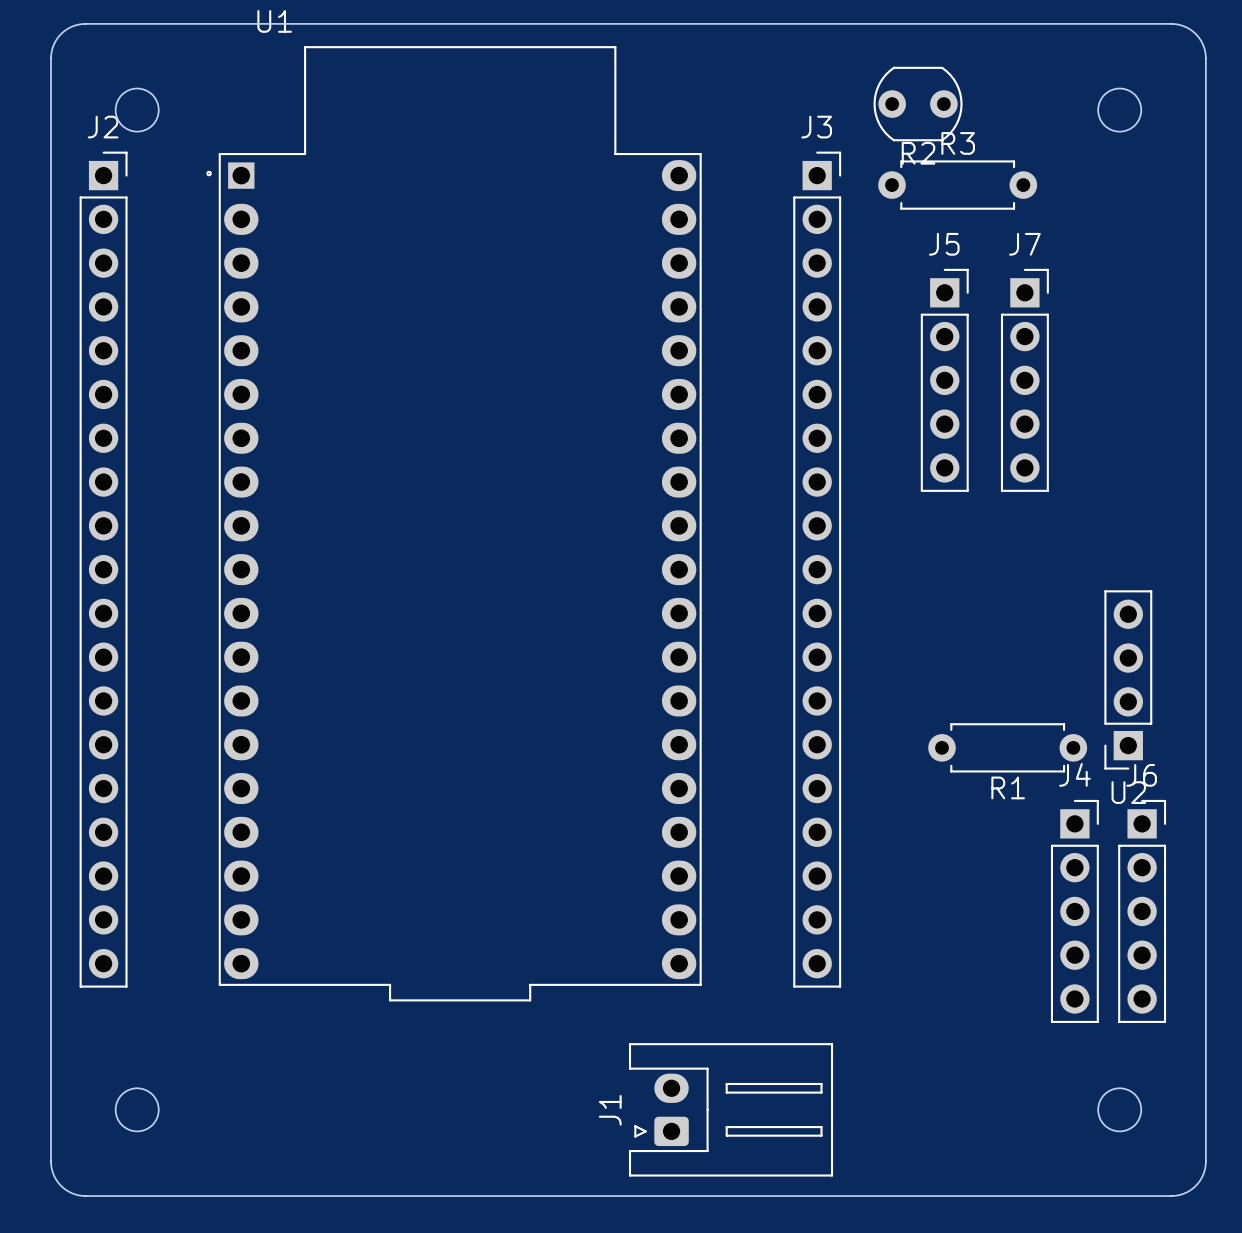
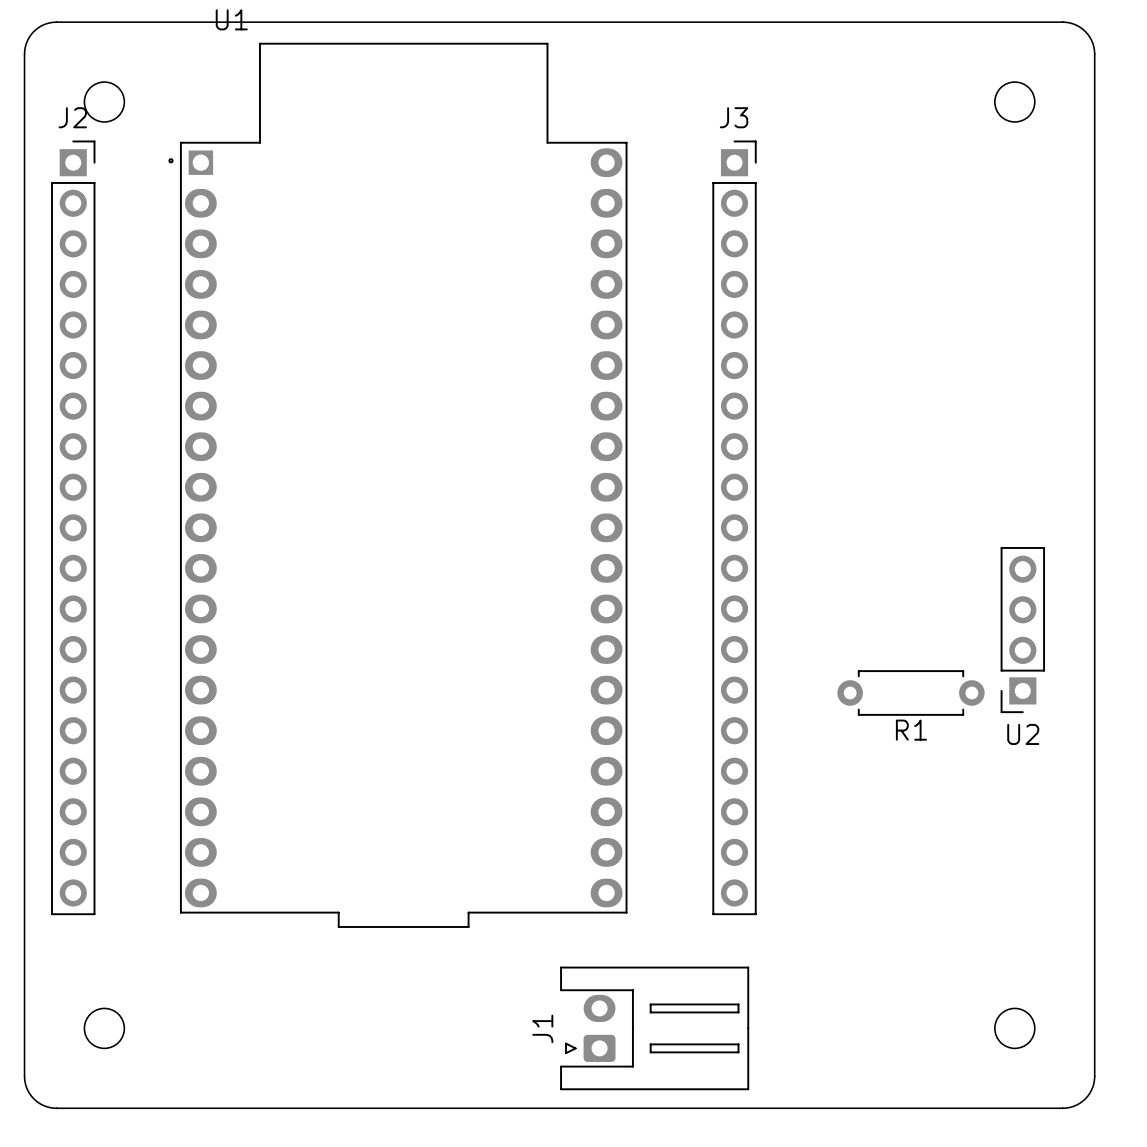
R2: (918, 104) -> none
R3: (957, 185) -> none
J5: (944, 380) -> none
J7: (1024, 380) -> none
J4: (1074, 911) -> none
J6: (1142, 911) -> none

